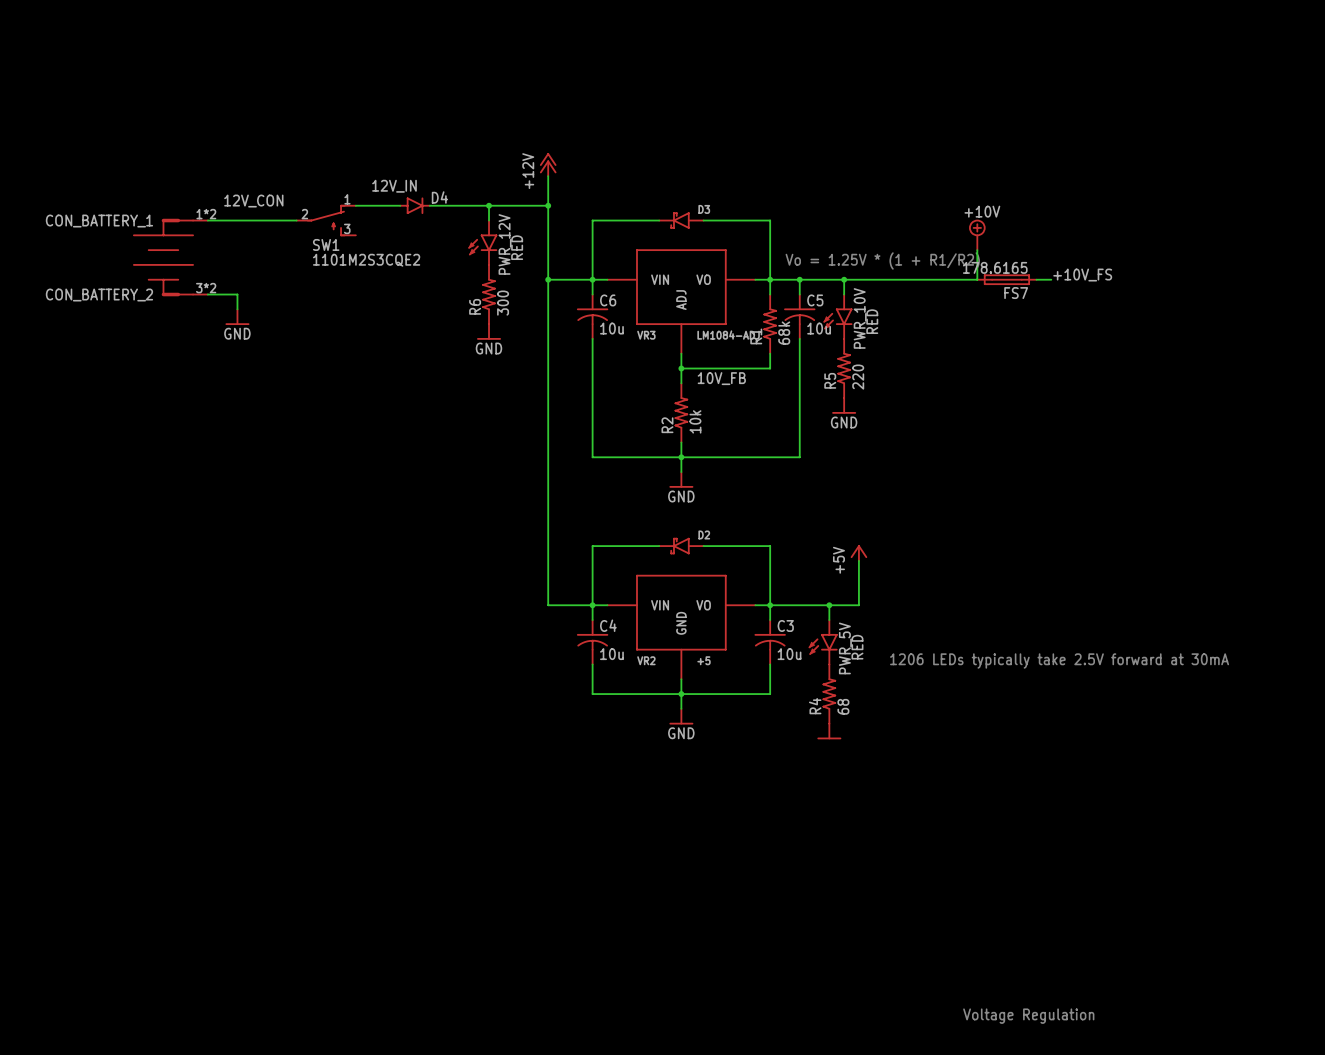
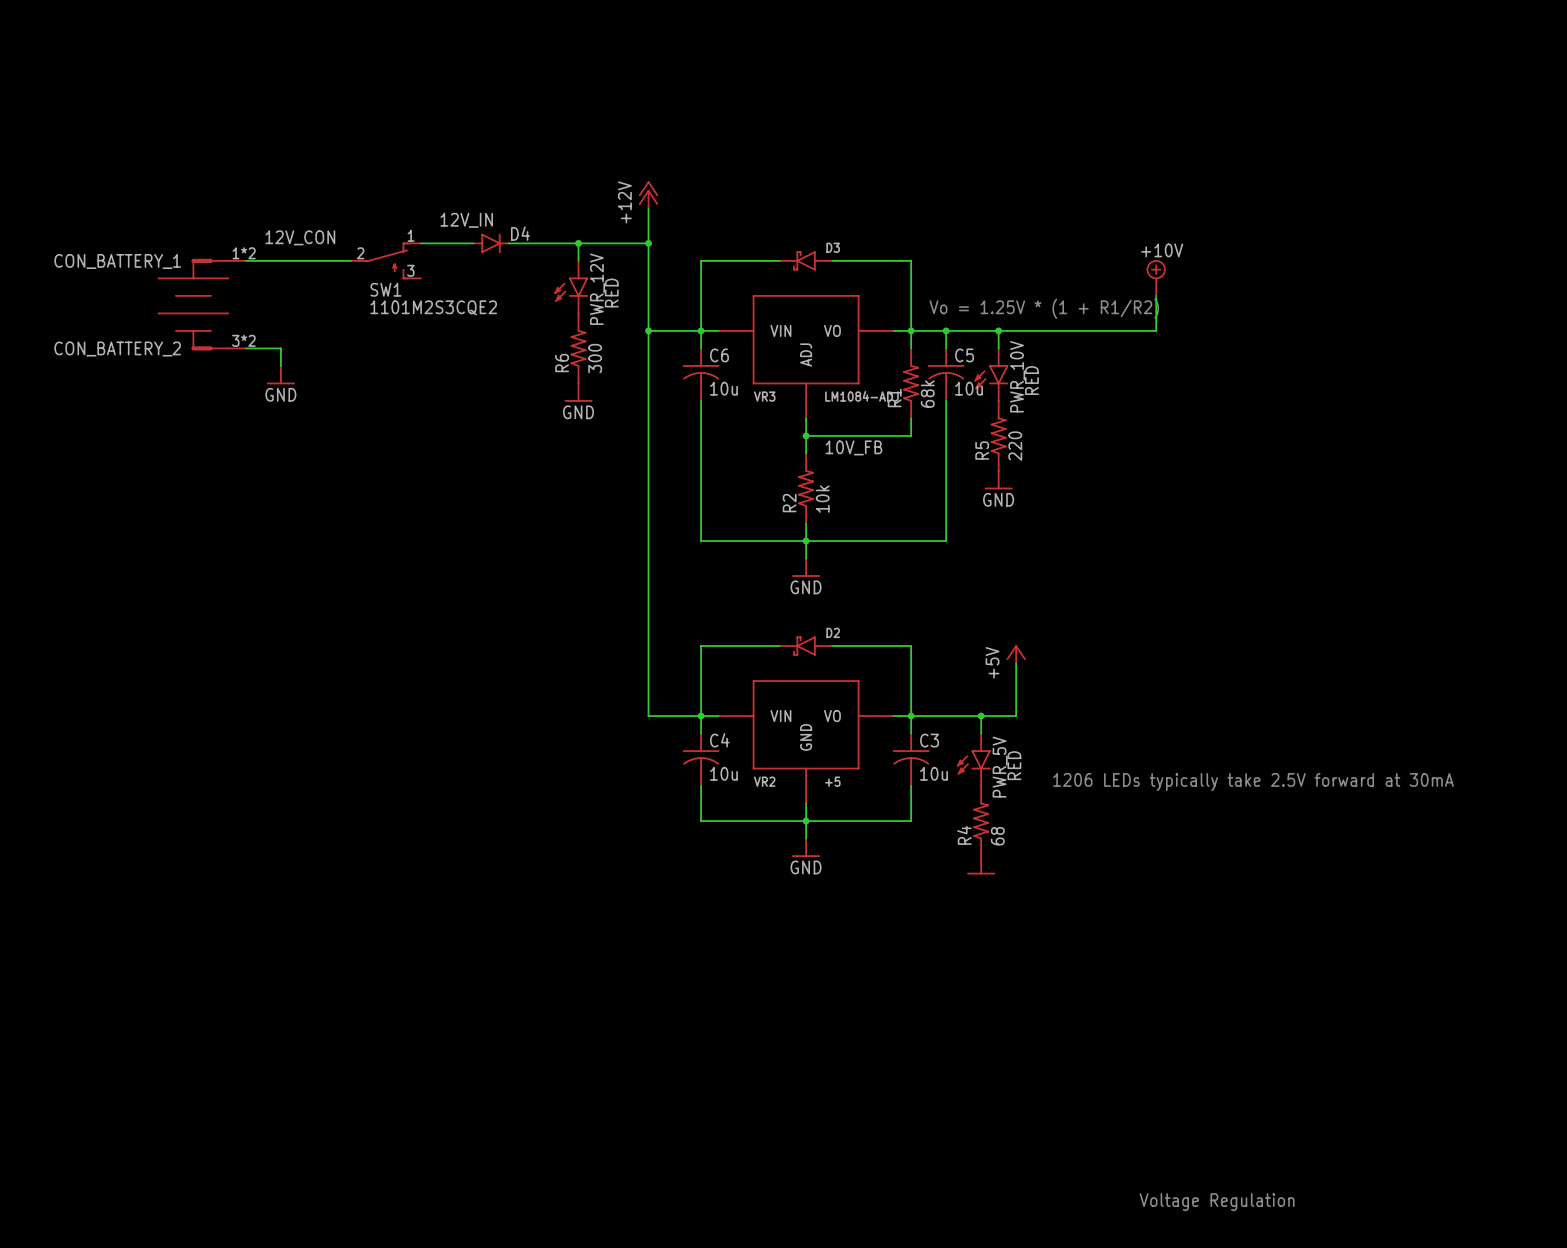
label: +10V_FS (1082, 275) -> none
FS7: 178.6165 (1006, 279) -> none
wire: (1036, 279) (1051, 279) -> none

